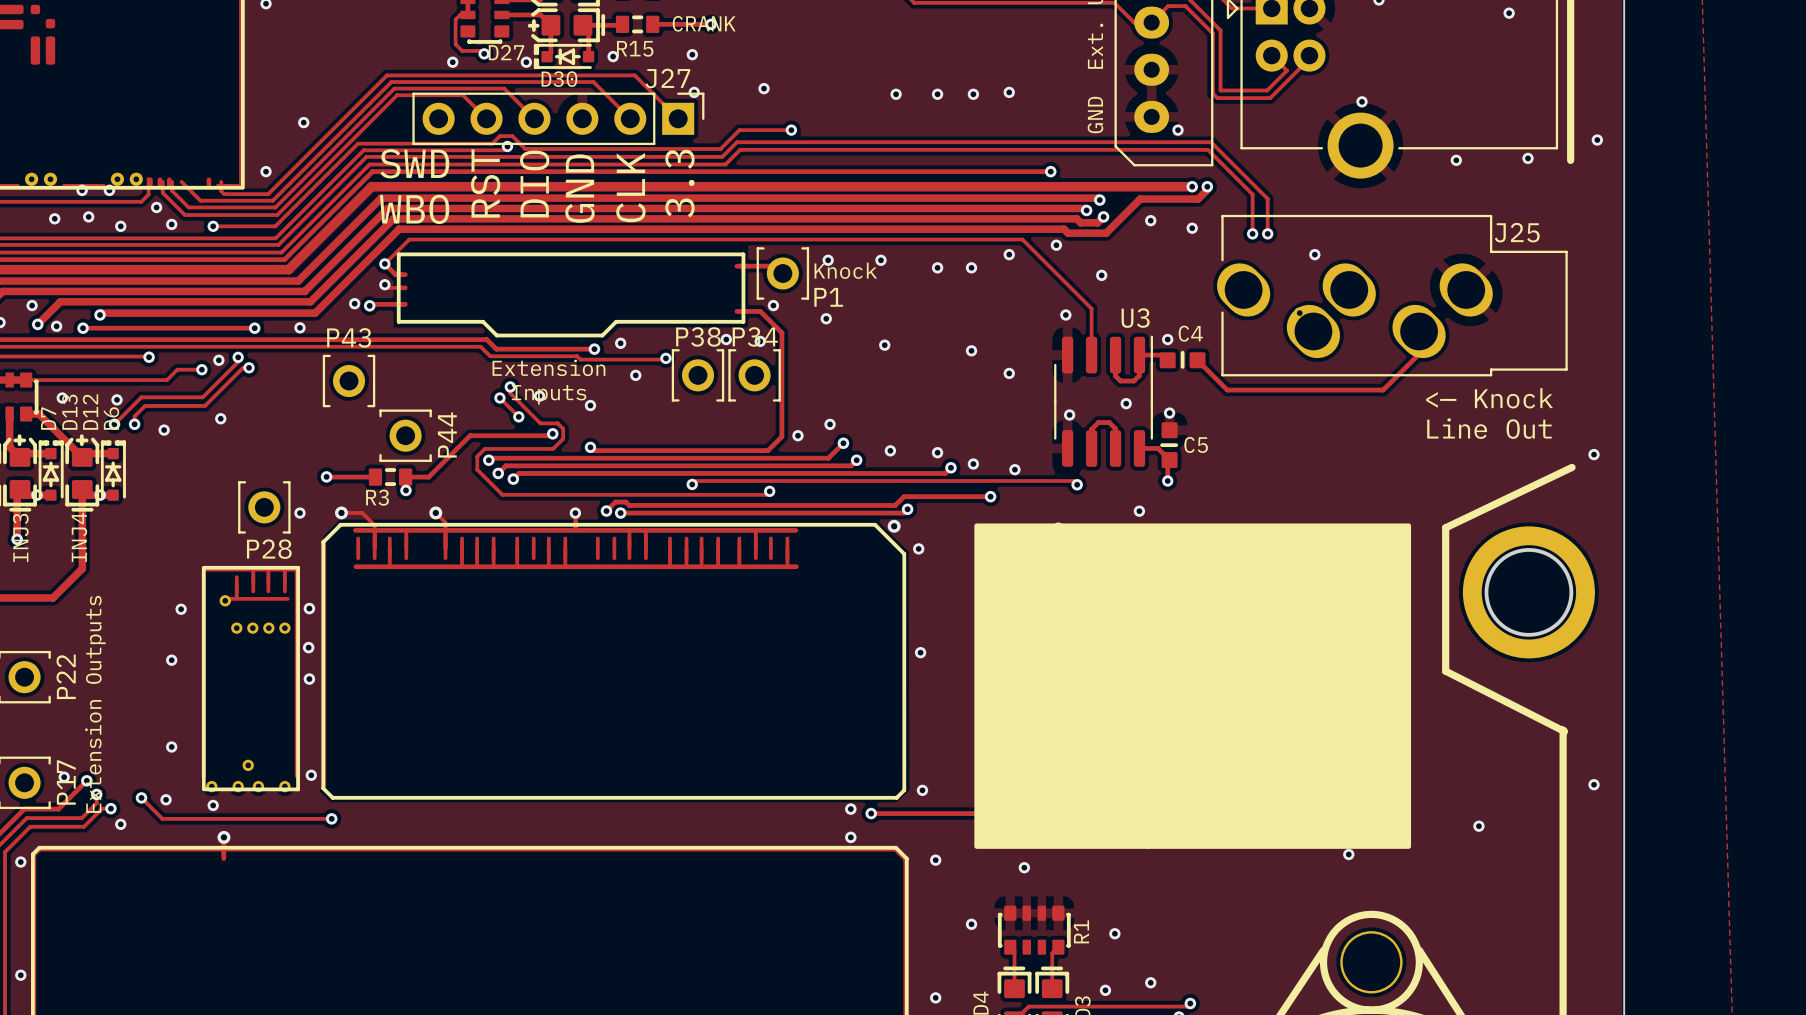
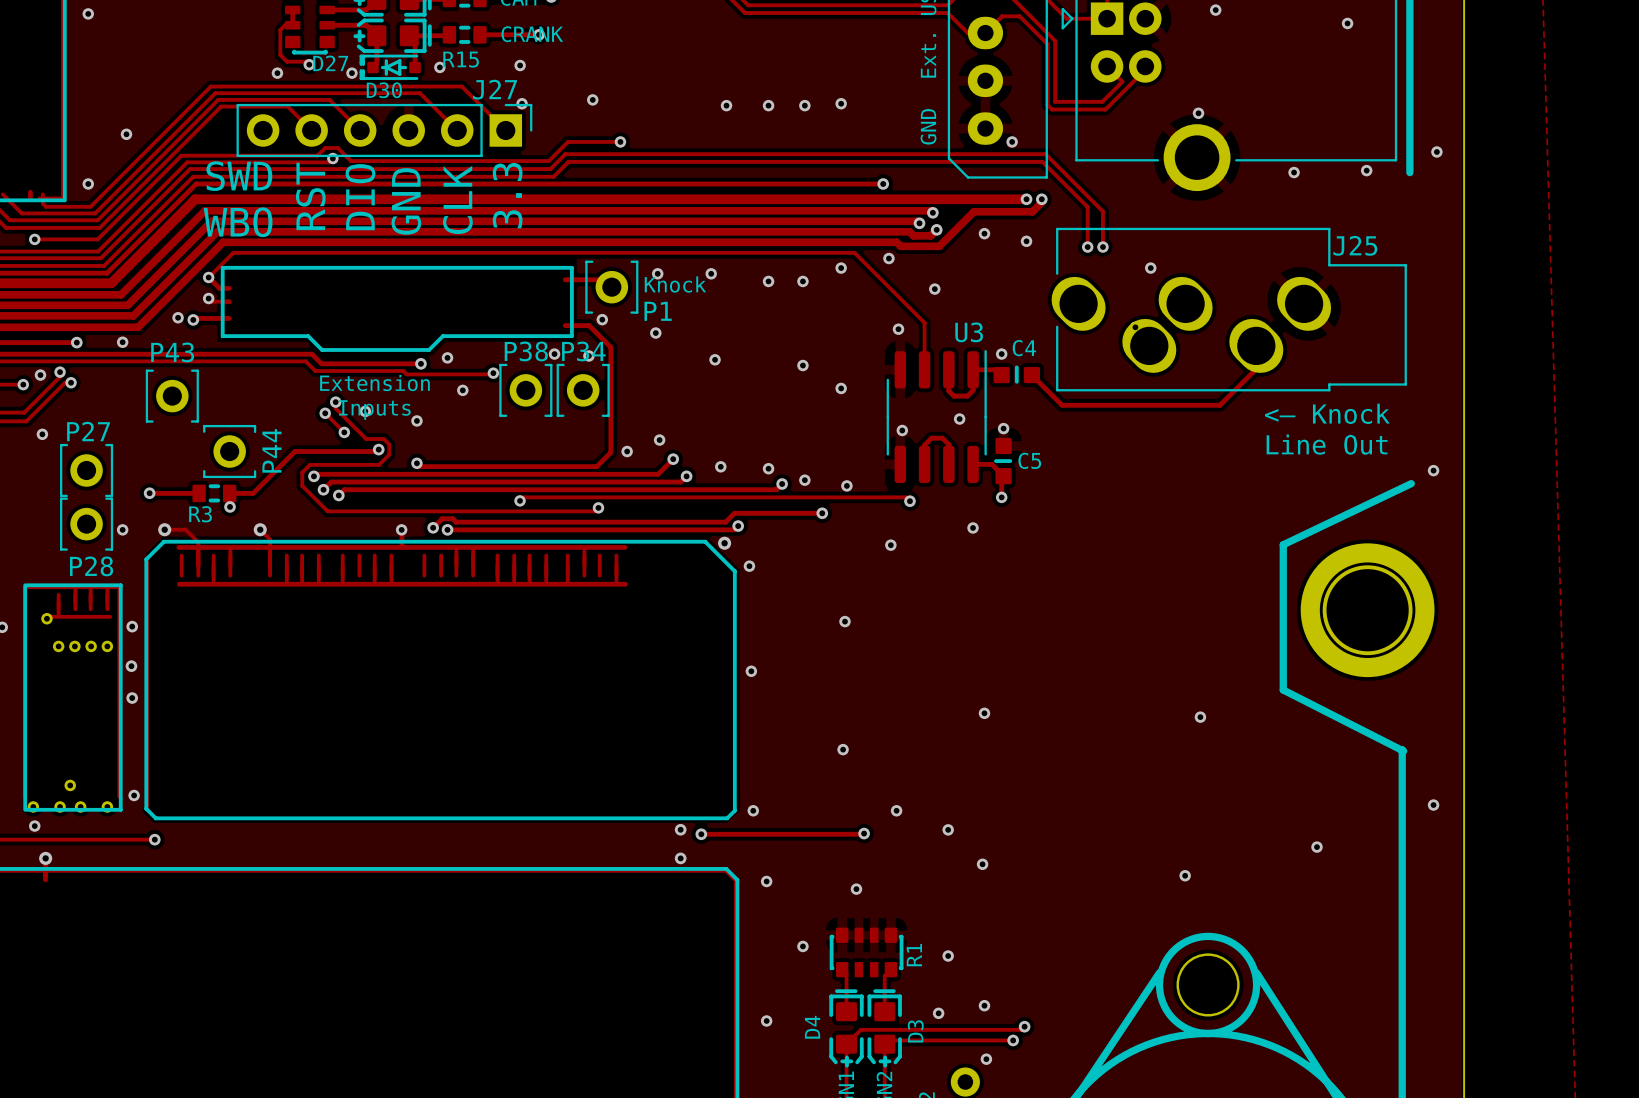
P27: none -> (86, 470)
drawing: [974, 523, 1412, 849] -> none

